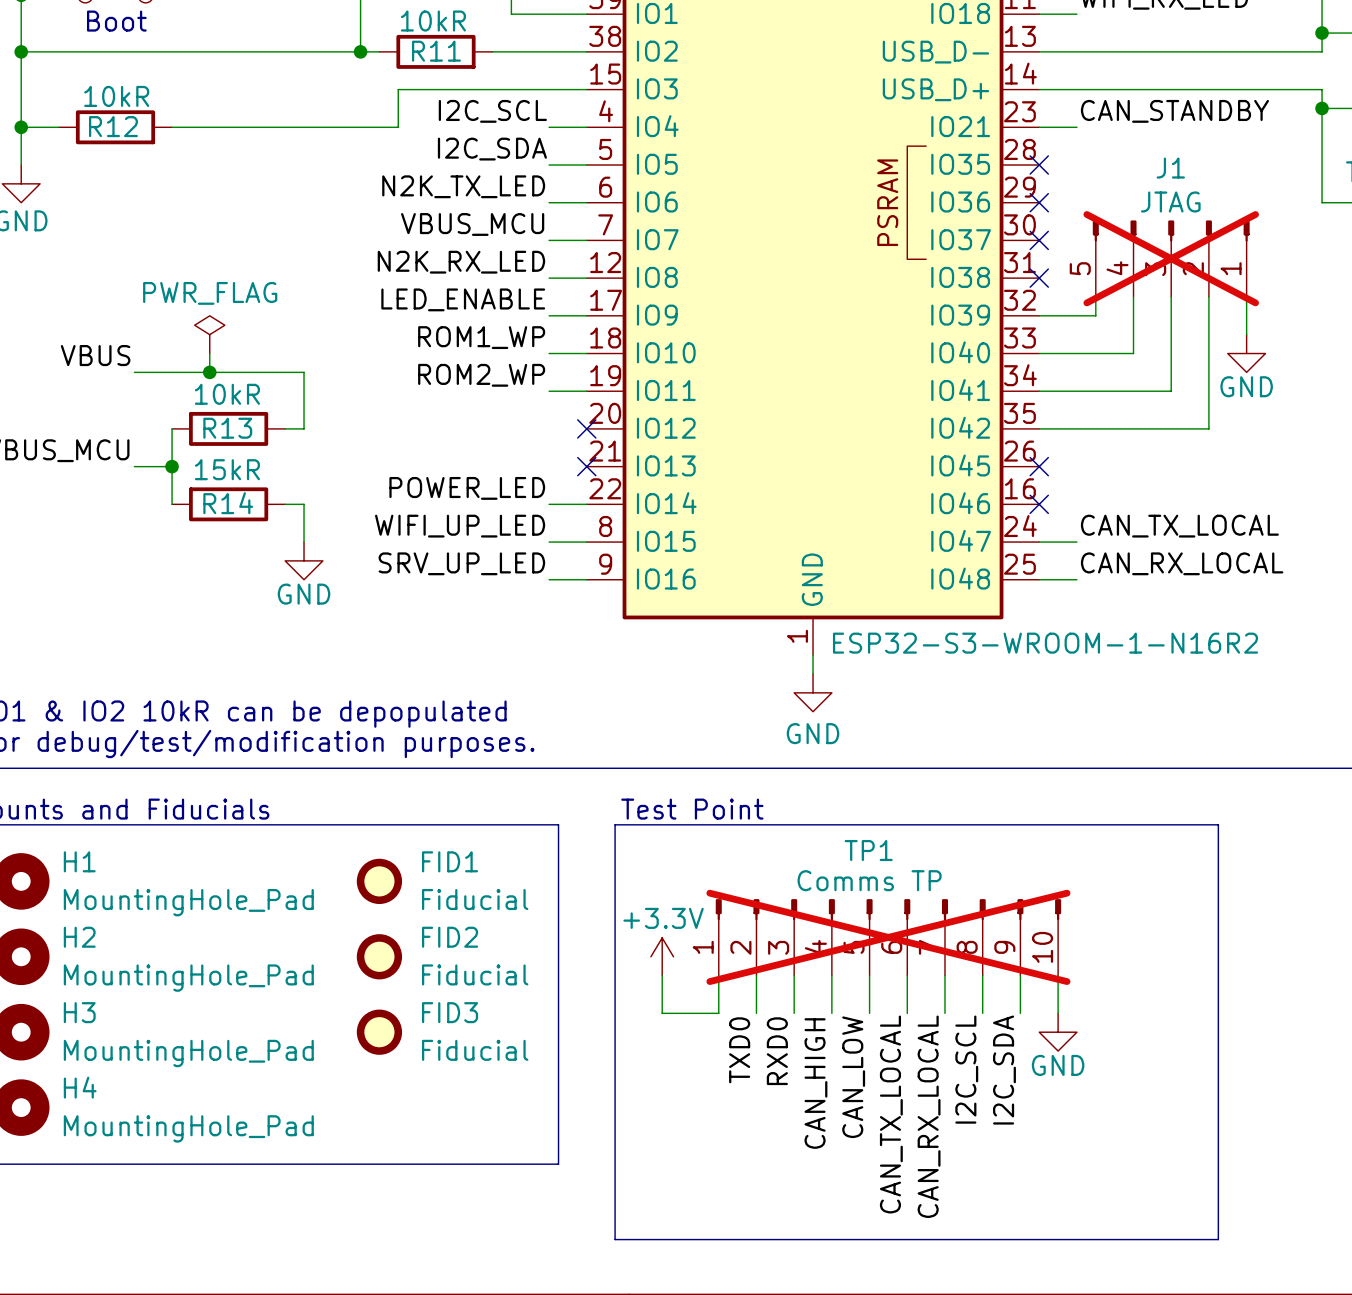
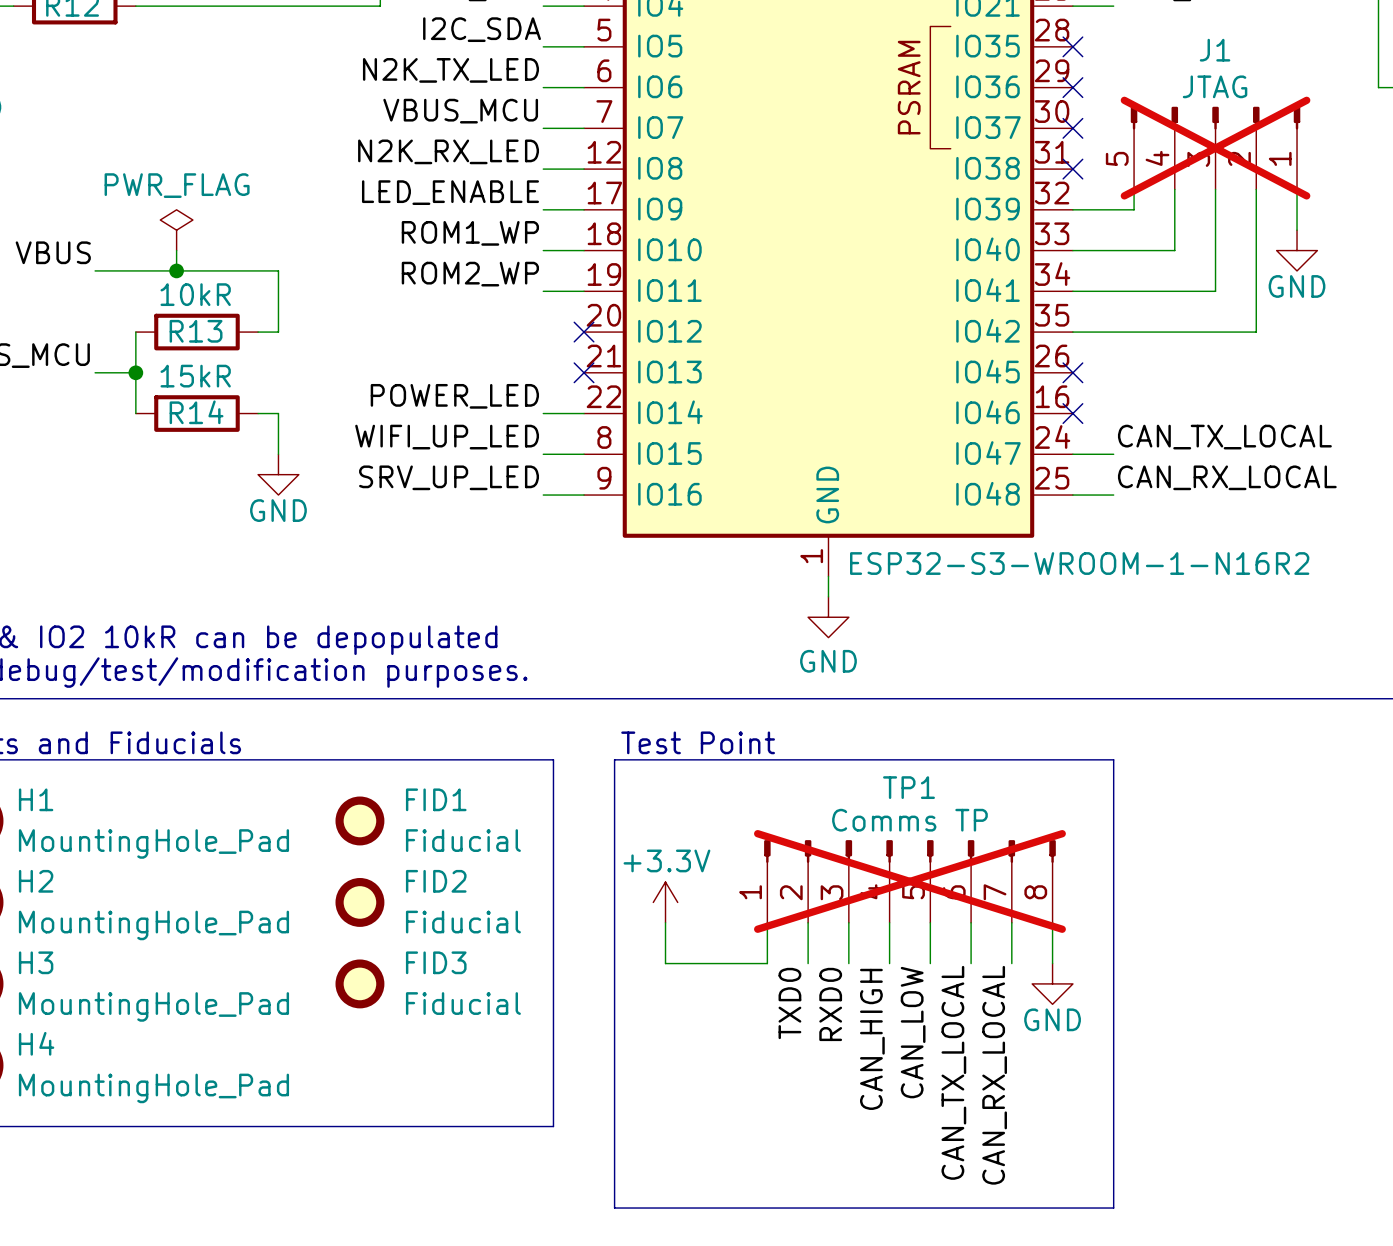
line: (1076, 824) (1218, 824) (1218, 1239) (1076, 1239) -> (1113, 759) (1113, 1208)
TP1 symbol: [715, 899, 1062, 976] -> [764, 840, 1056, 923]
wire: (718, 975) (718, 1013) -> (767, 963) (726, 963)
wire: (1058, 975) (1058, 1013) -> none
power symbol position: GND (1058, 1032) -> GND (1052, 983)
label: TXD0 (739, 1050) -> none
label: RXD0 (777, 1051) -> TXD0 (789, 1003)
label: I2C_SCL (966, 1069) -> CAN_RX_LOCAL (994, 1075)
label: I2C_SDA (1004, 1070) -> none
label: CAN_LOW (853, 1077) -> CAN_HIGH (872, 1039)
label: CAN_HIGH (815, 1083) -> RXD0 (830, 1004)
label: CAN_TX_LOCAL (891, 1114) -> CAN_LOW (913, 1032)
label: CAN_RX_LOCAL (929, 1116) -> CAN_TX_LOCAL (953, 1072)

